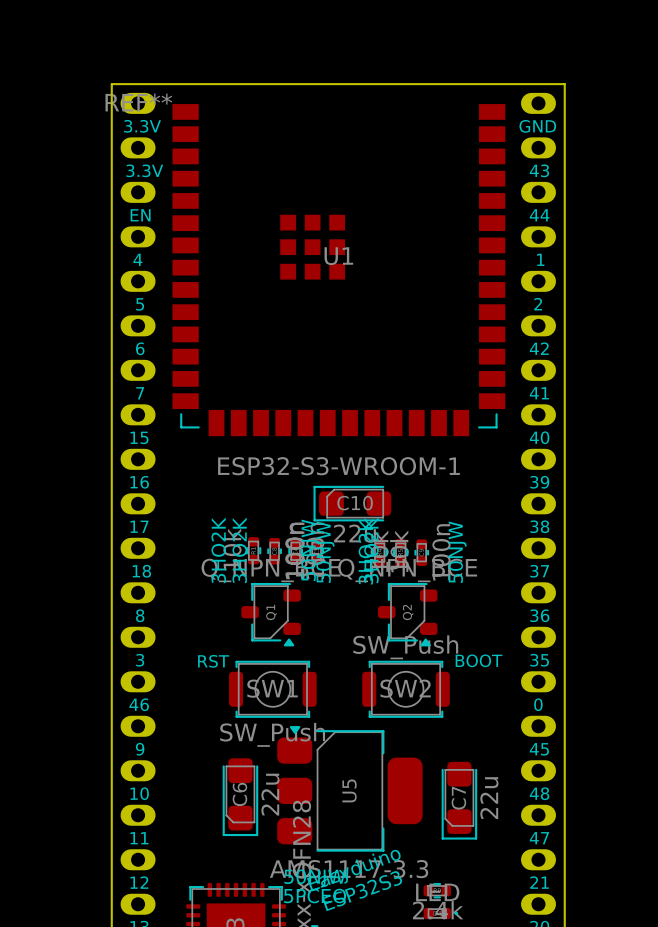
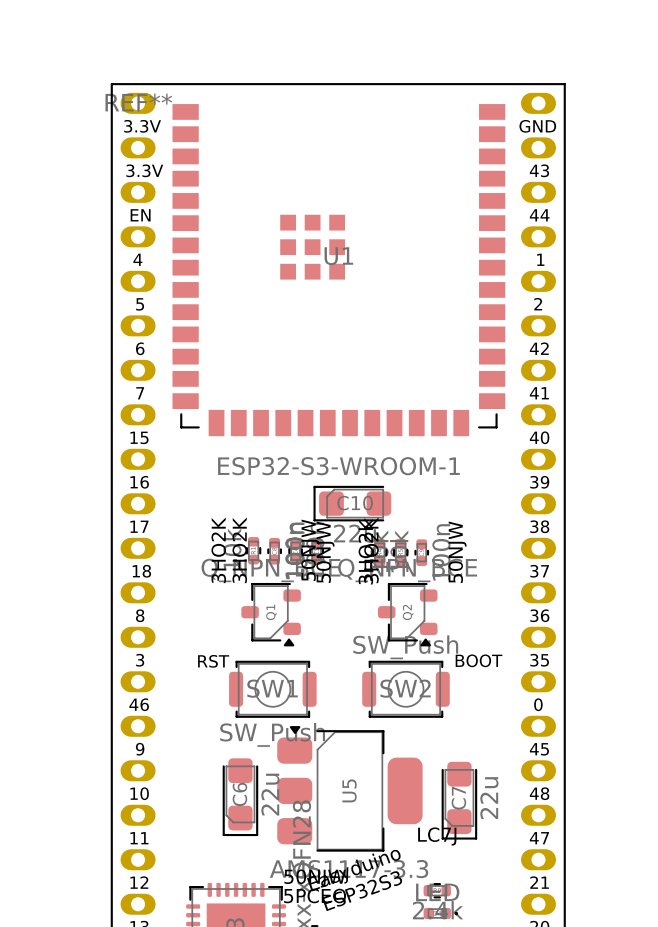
part text: none -> LC7J (437, 836)

